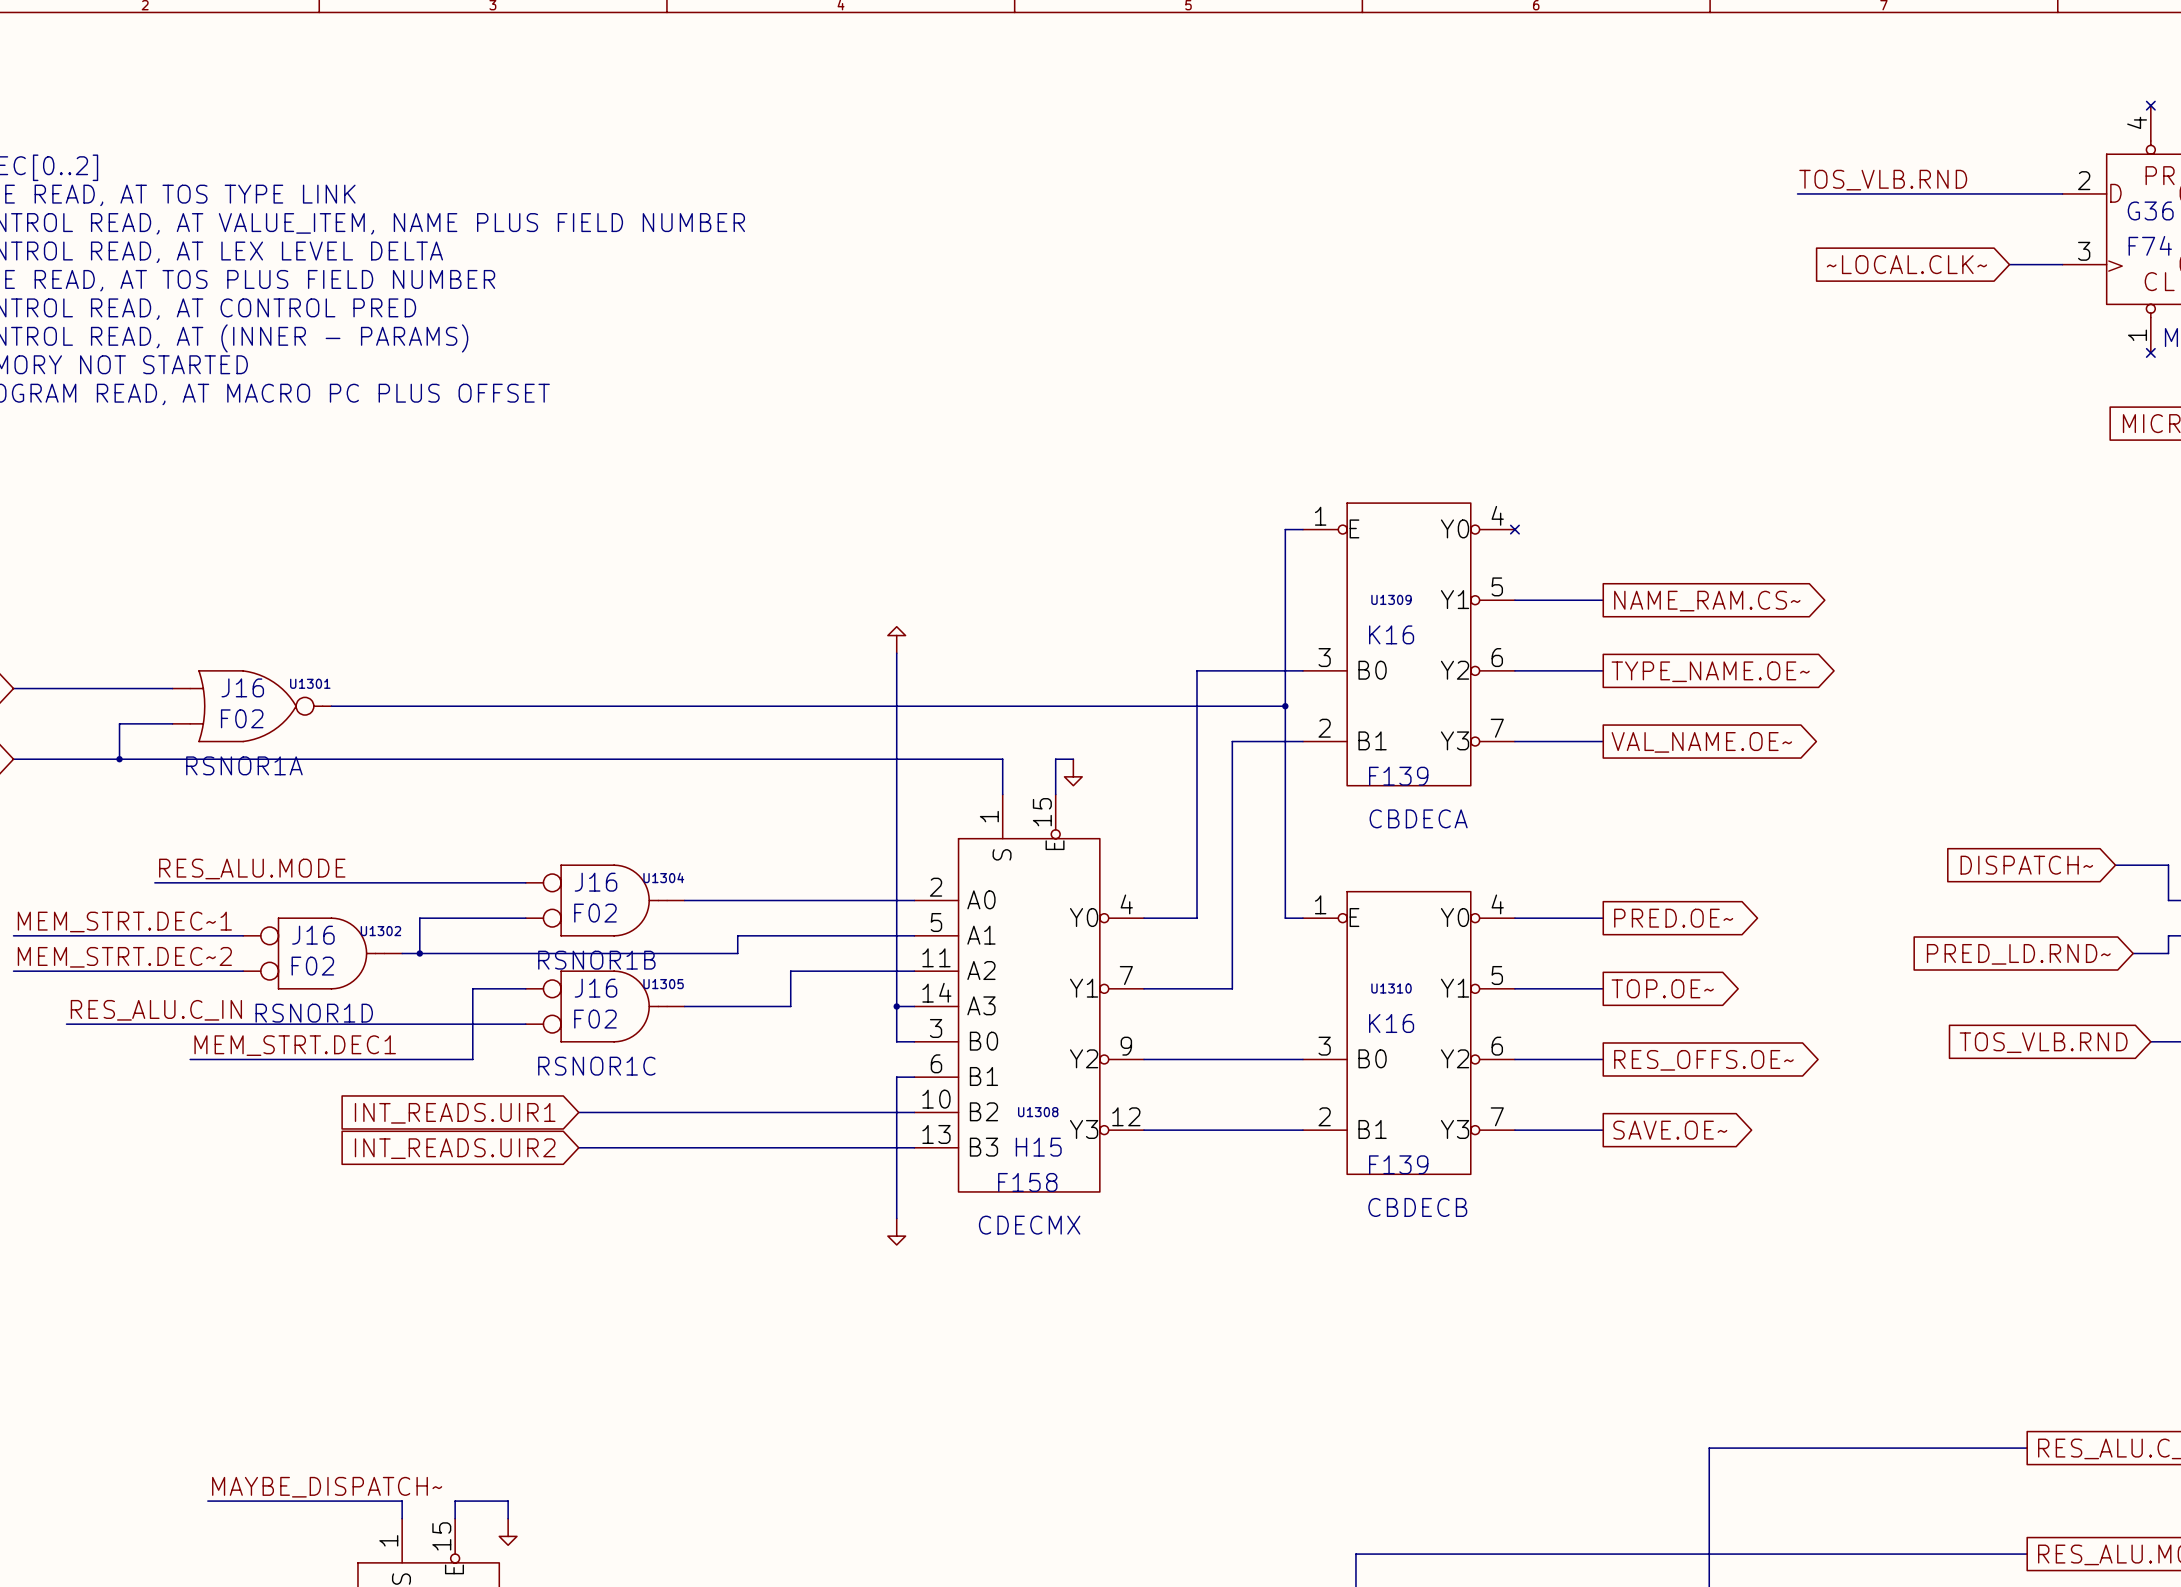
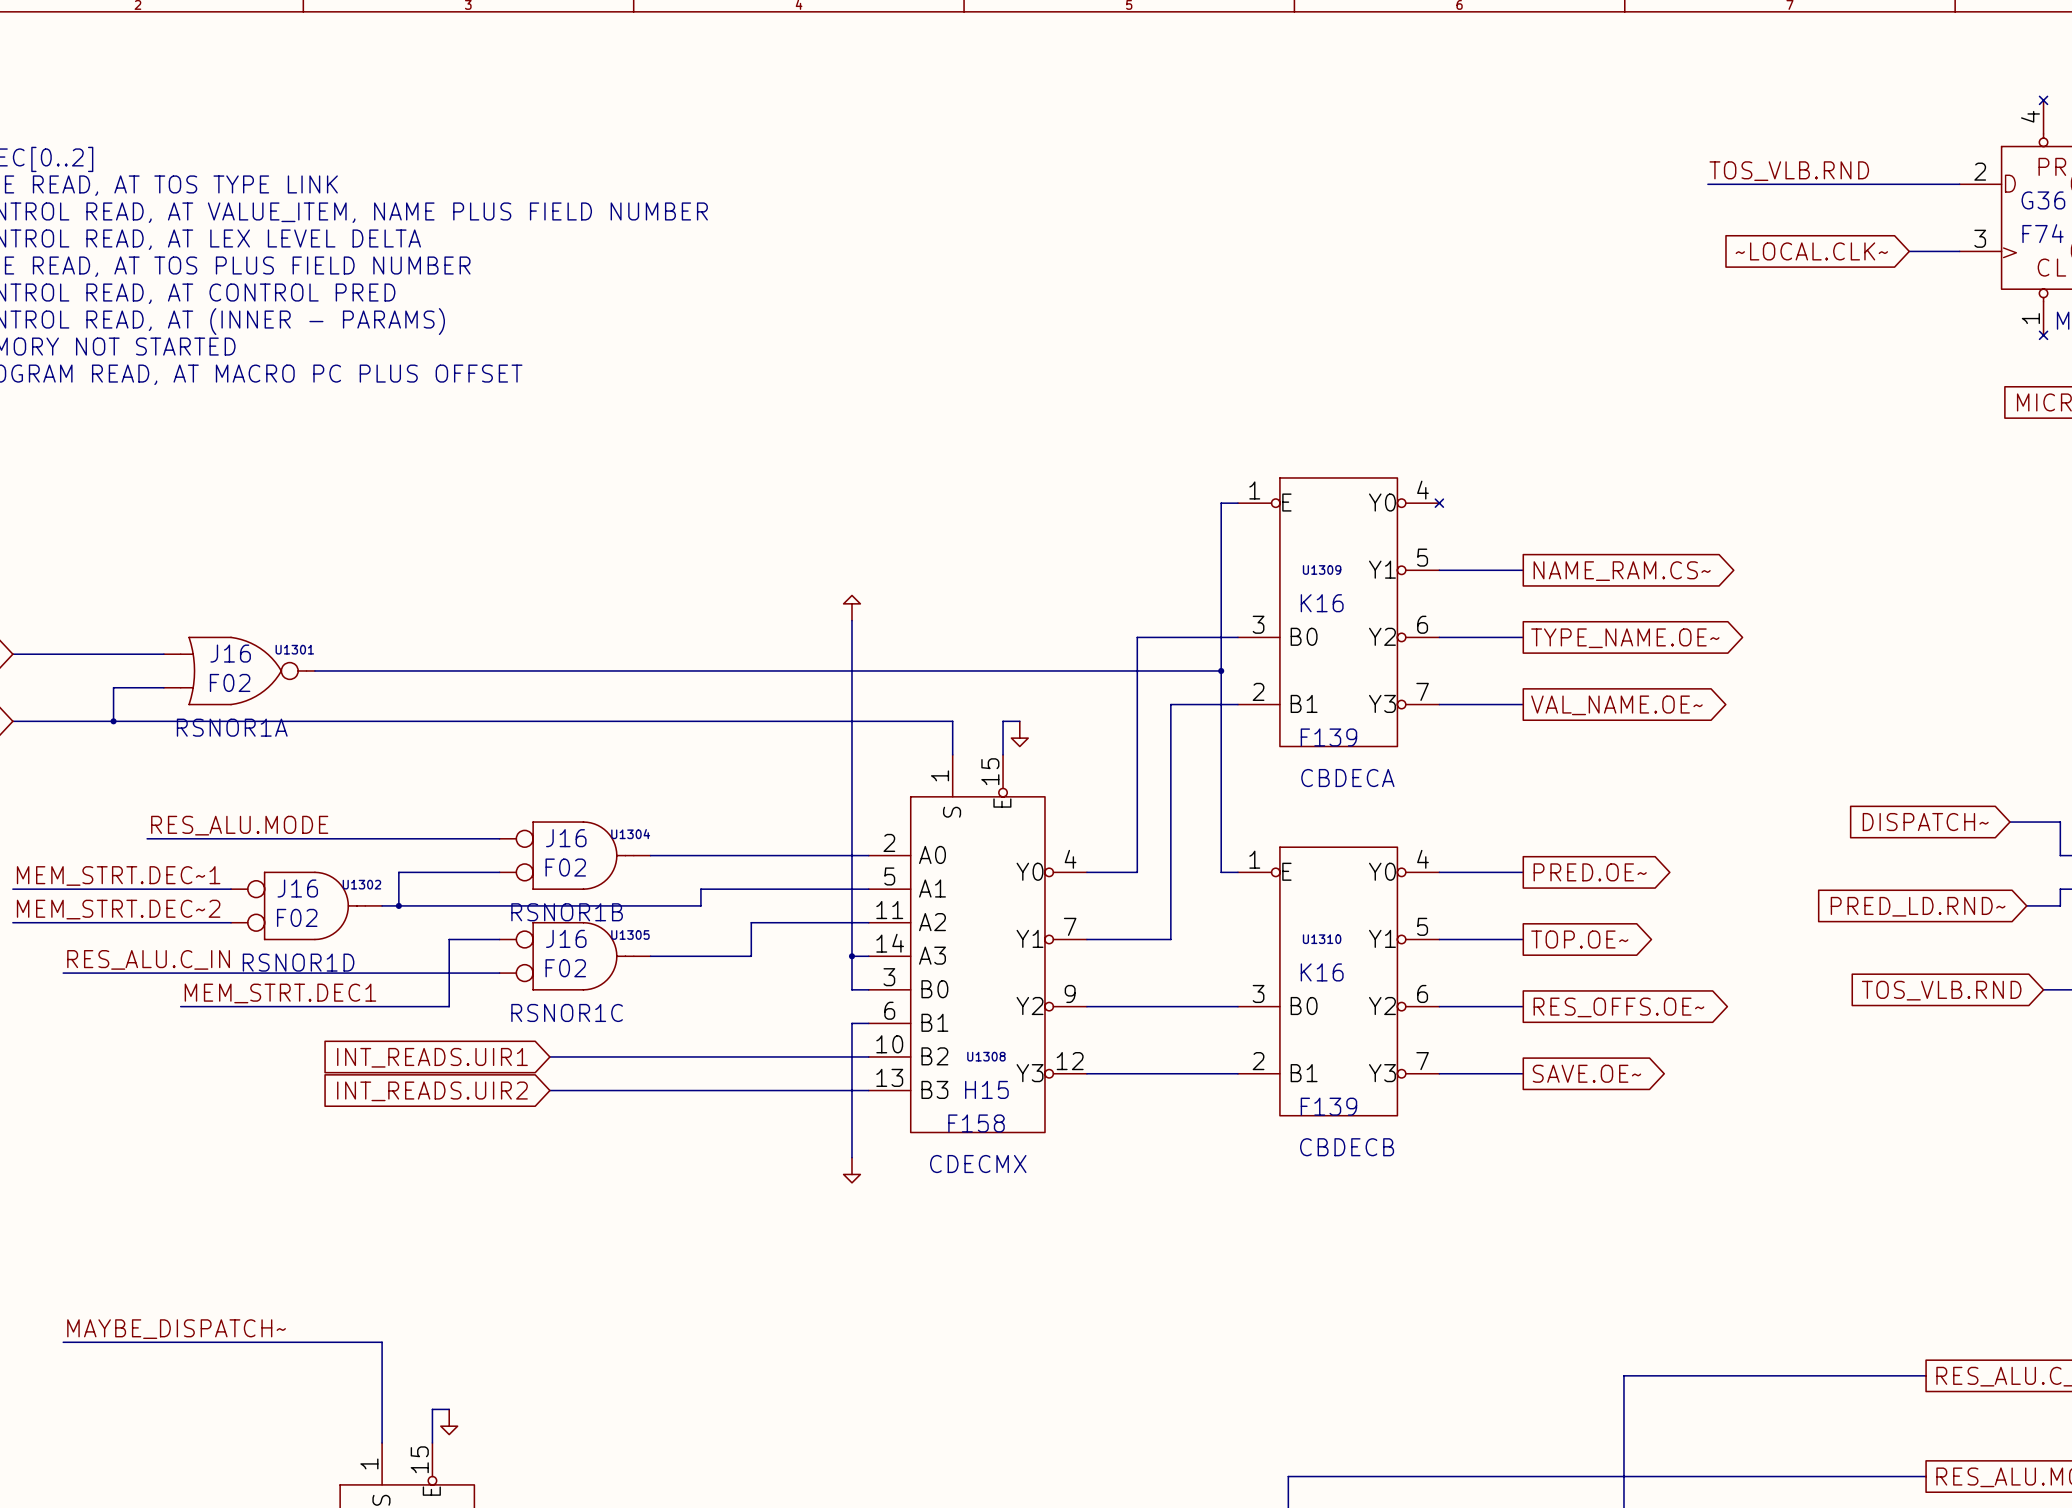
label position: MAYBE_DISPATCH~ (327, 1487) -> MAYBE_DISPATCH~ (176, 1329)
wire: (207, 1501) (402, 1501) -> (63, 1342) (382, 1342) (382, 1426)
wire: (455, 1501) (508, 1501) (508, 1518) -> (432, 1426) (432, 1409) (449, 1409)
power symbol position: (508, 1532) -> (449, 1422)

